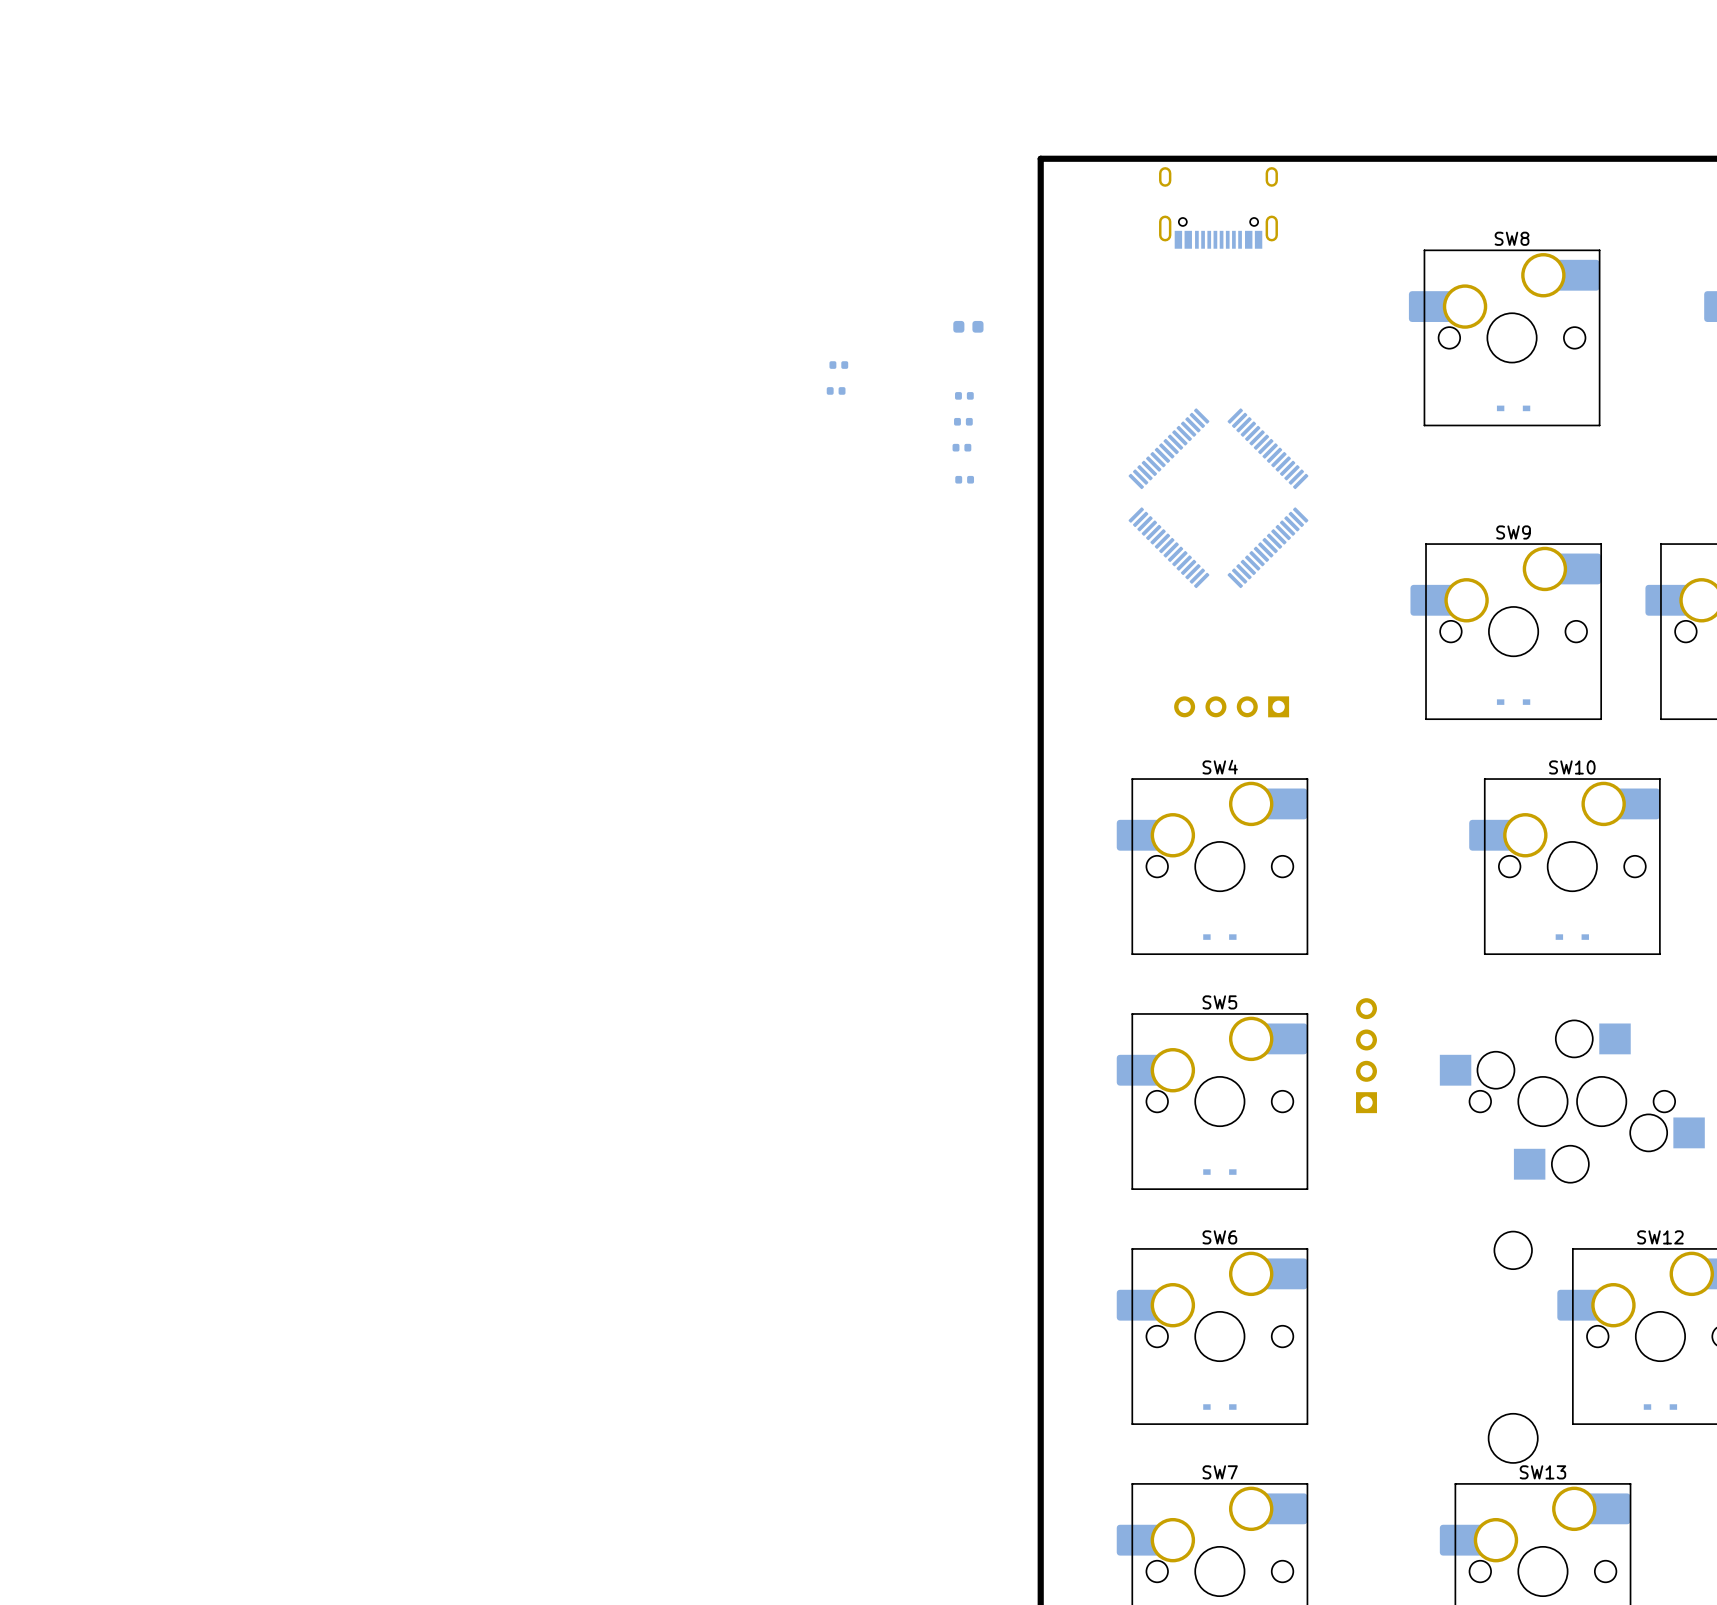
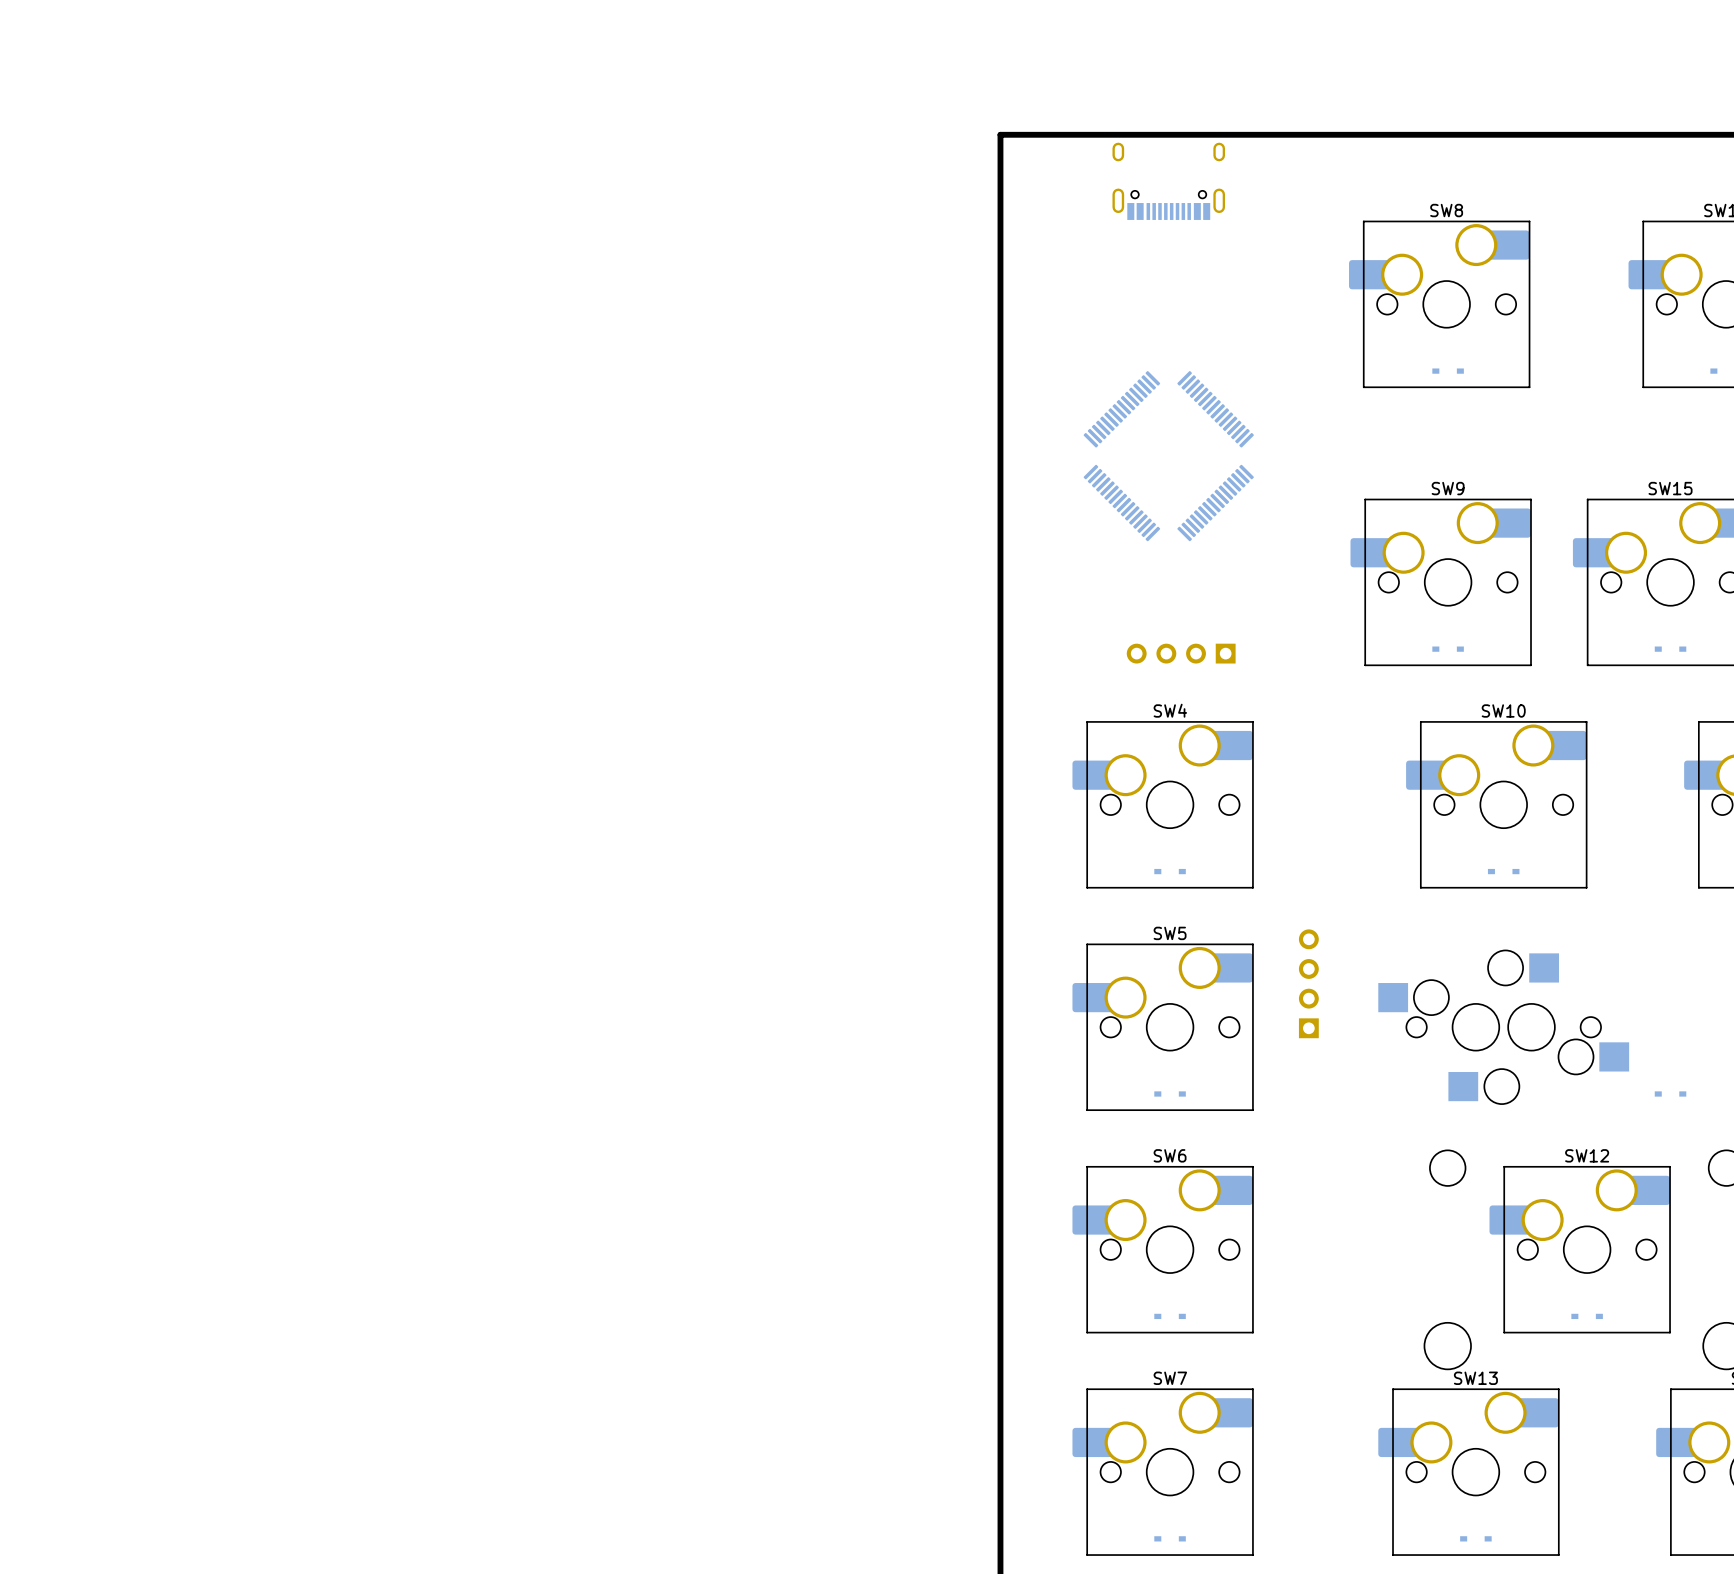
part: (968, 326) -> none
part: (838, 365) -> none
part: (836, 390) -> none
part: (964, 395) -> none
part: (963, 421) -> none
part: (961, 447) -> none
part: (964, 479) -> none

